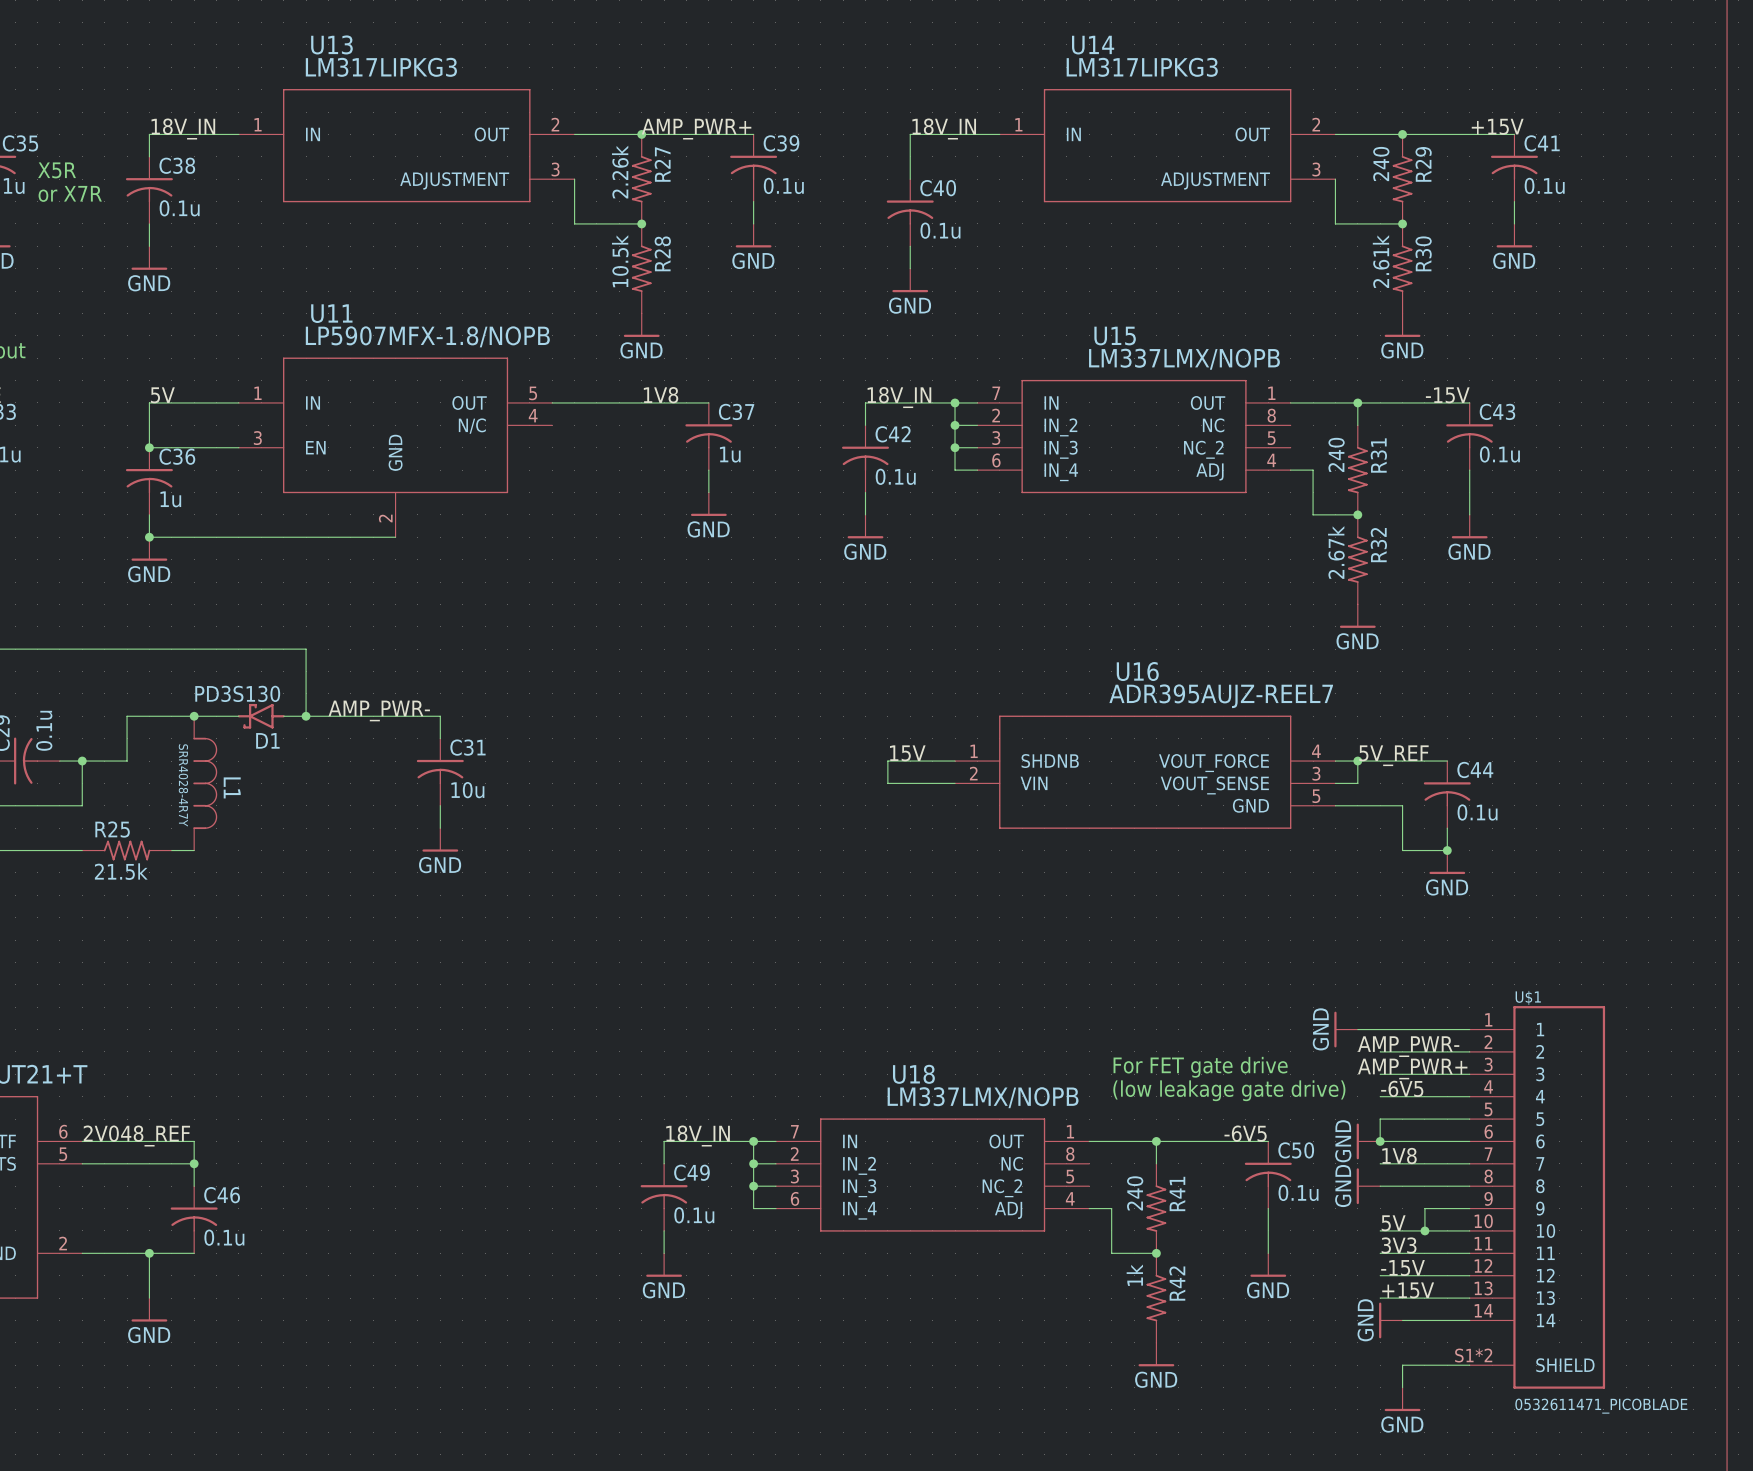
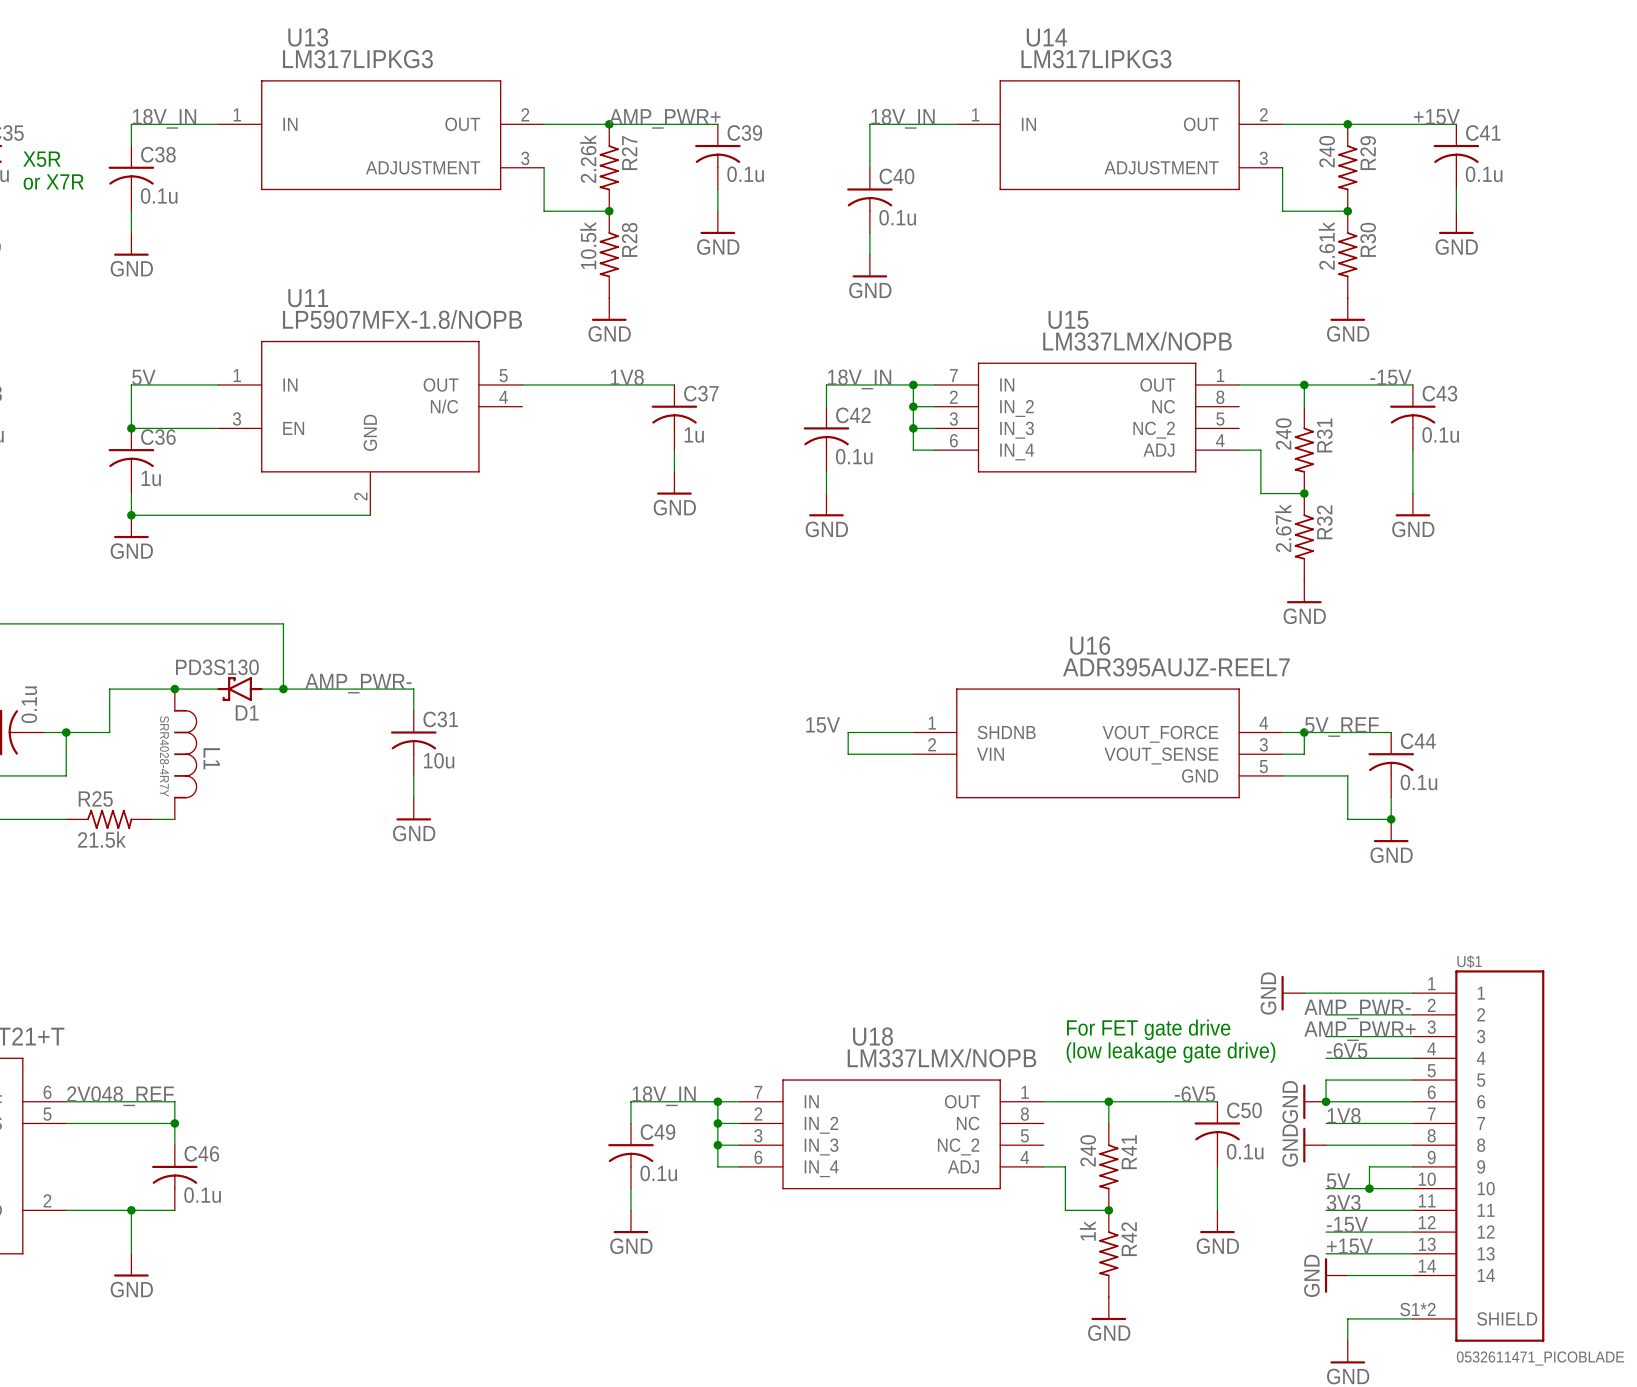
label position: 15V (907, 753) -> 15V (823, 725)

